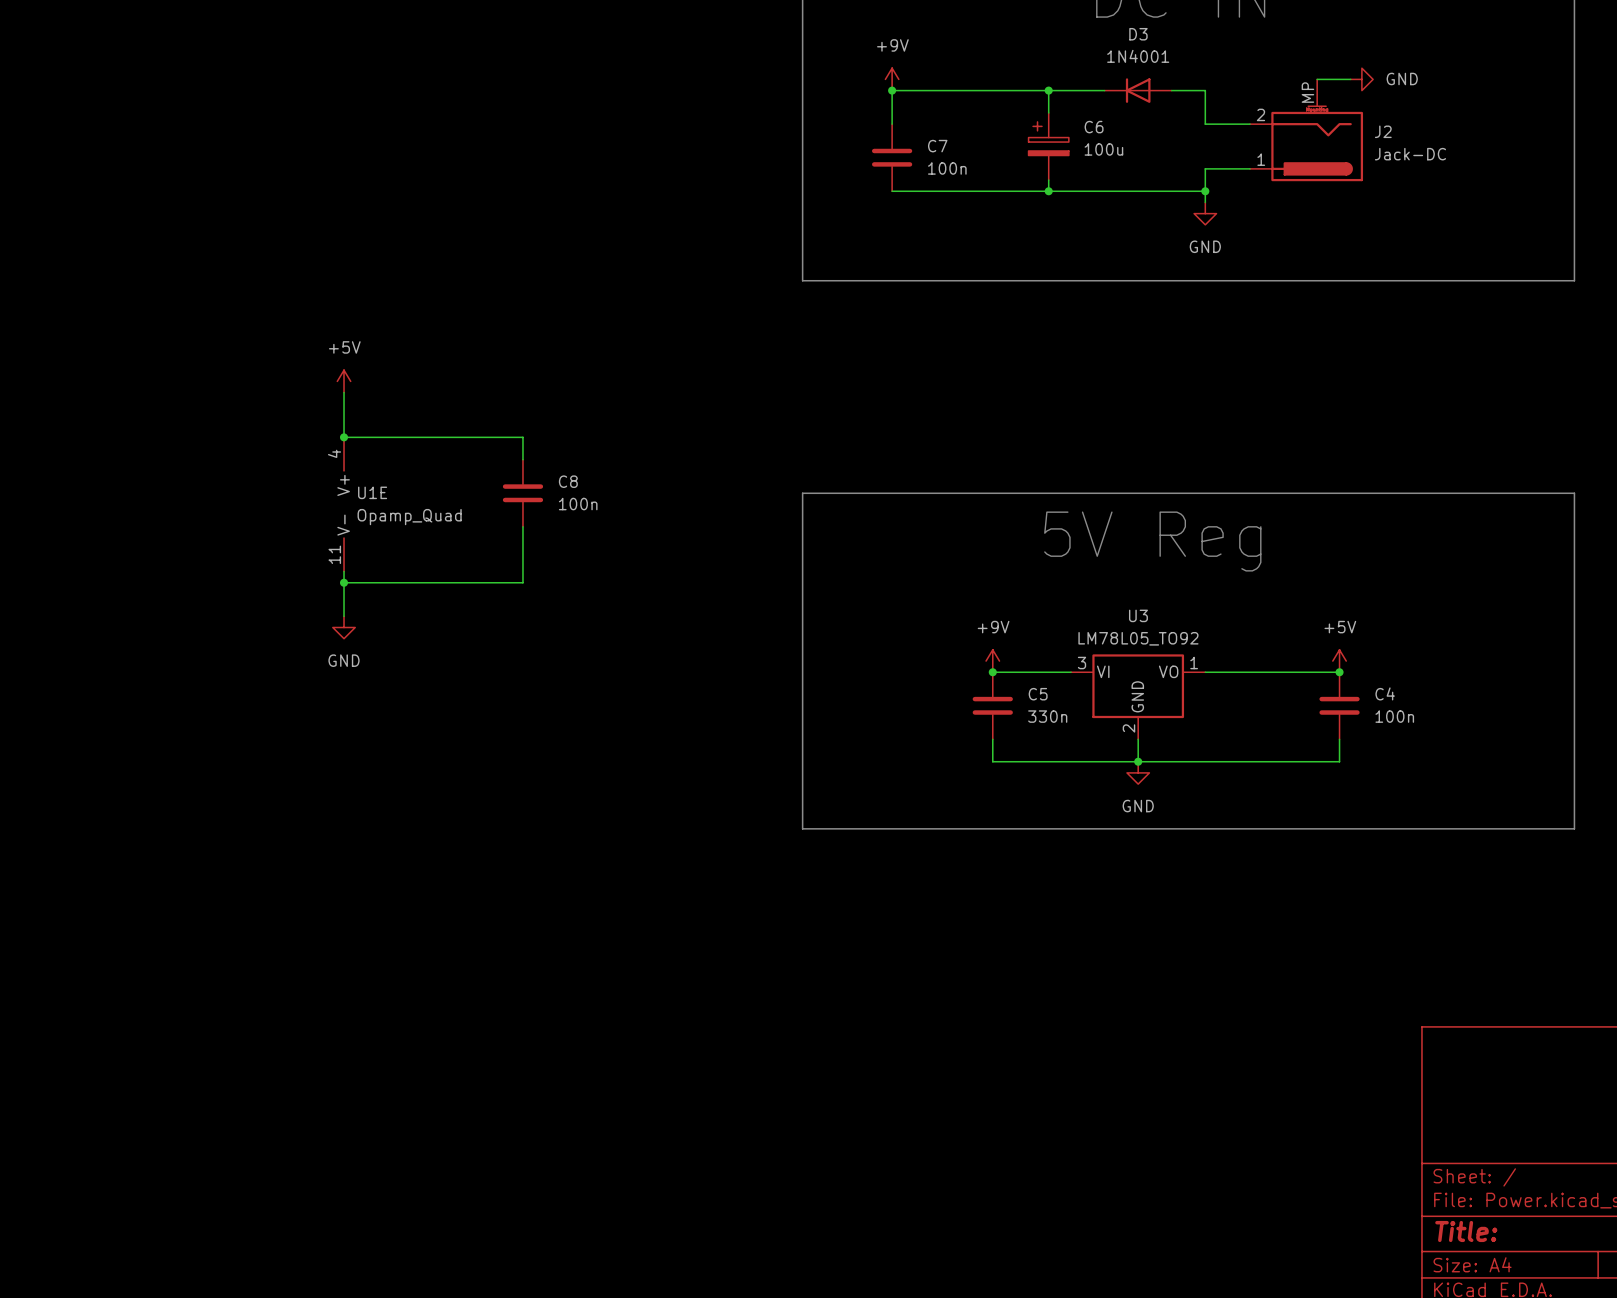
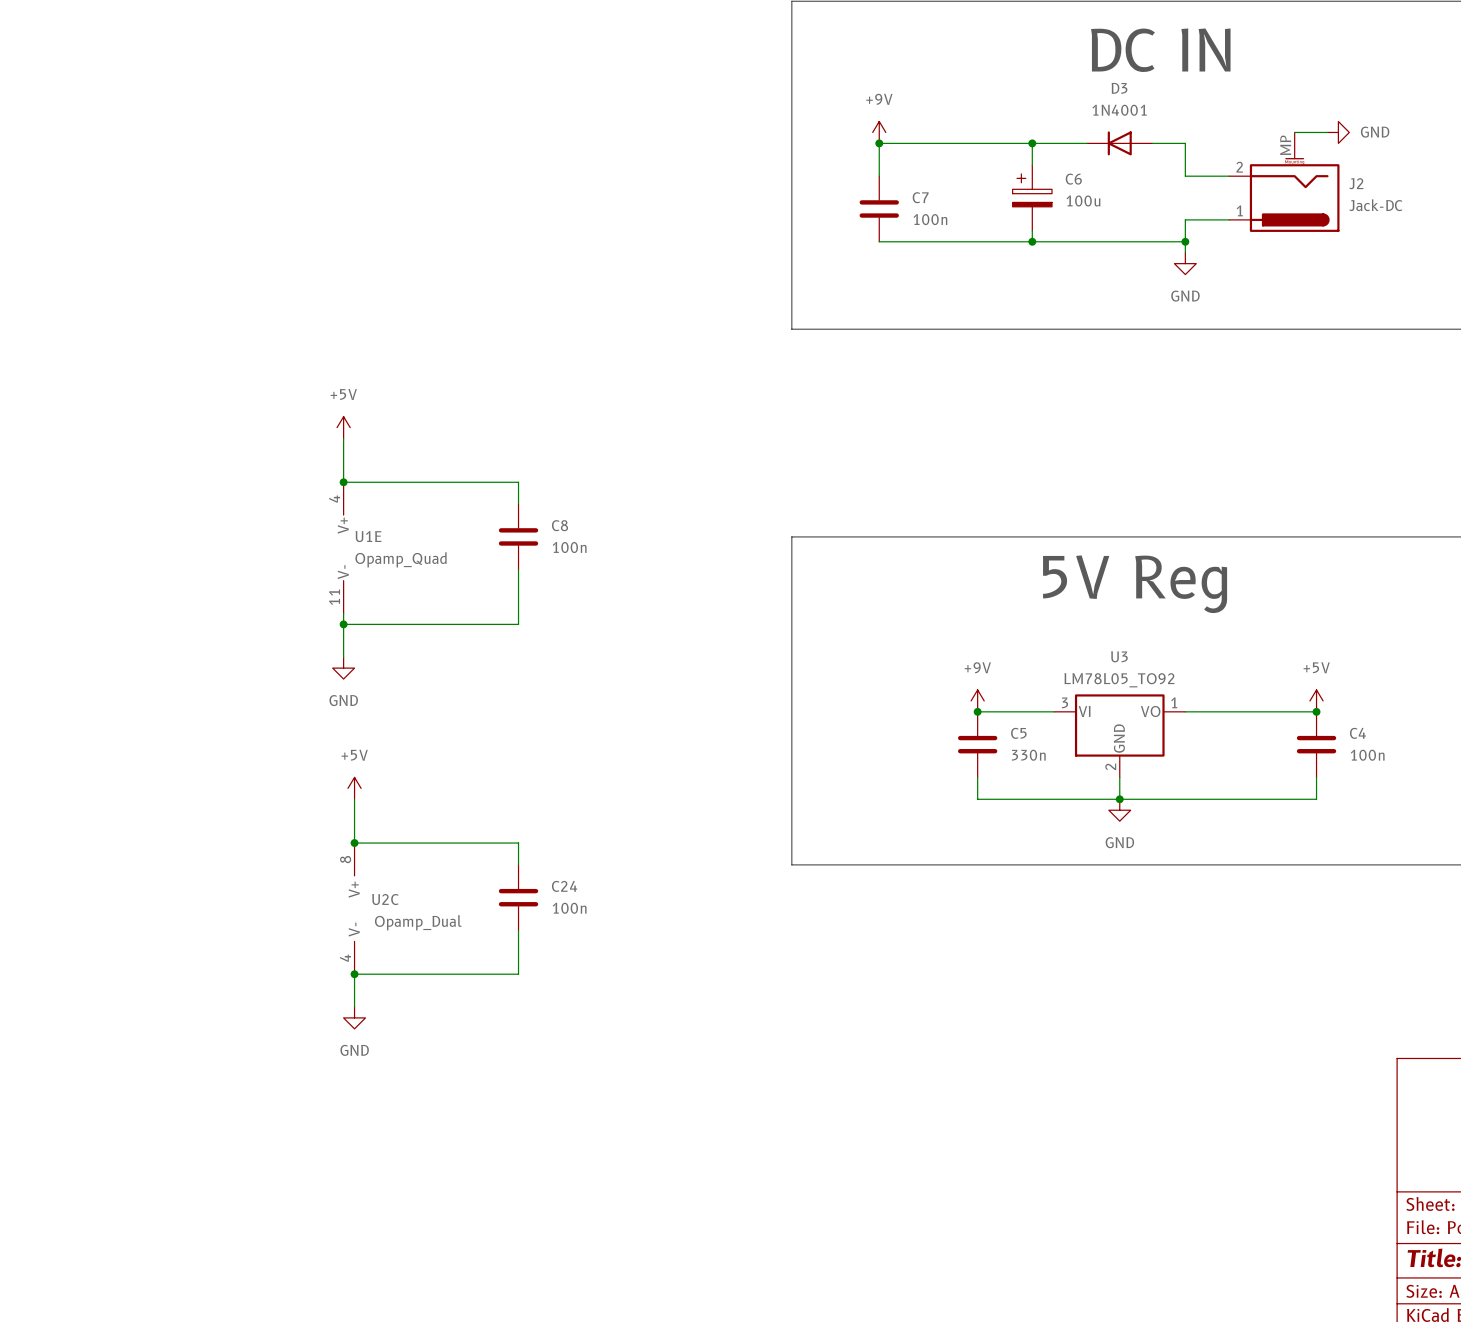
power symbol: none -> +5V (354, 788)
wire: none -> (354, 799) (354, 843) (518, 843) (518, 864)
junction: none -> (354, 843)
C24: none -> 100n (518, 897)
U2C: none -> Opamp_Dual (354, 908)
wire: none -> (518, 930) (518, 974) (354, 974) (354, 1007)
junction: none -> (354, 974)
power symbol: none -> GND (354, 1017)

